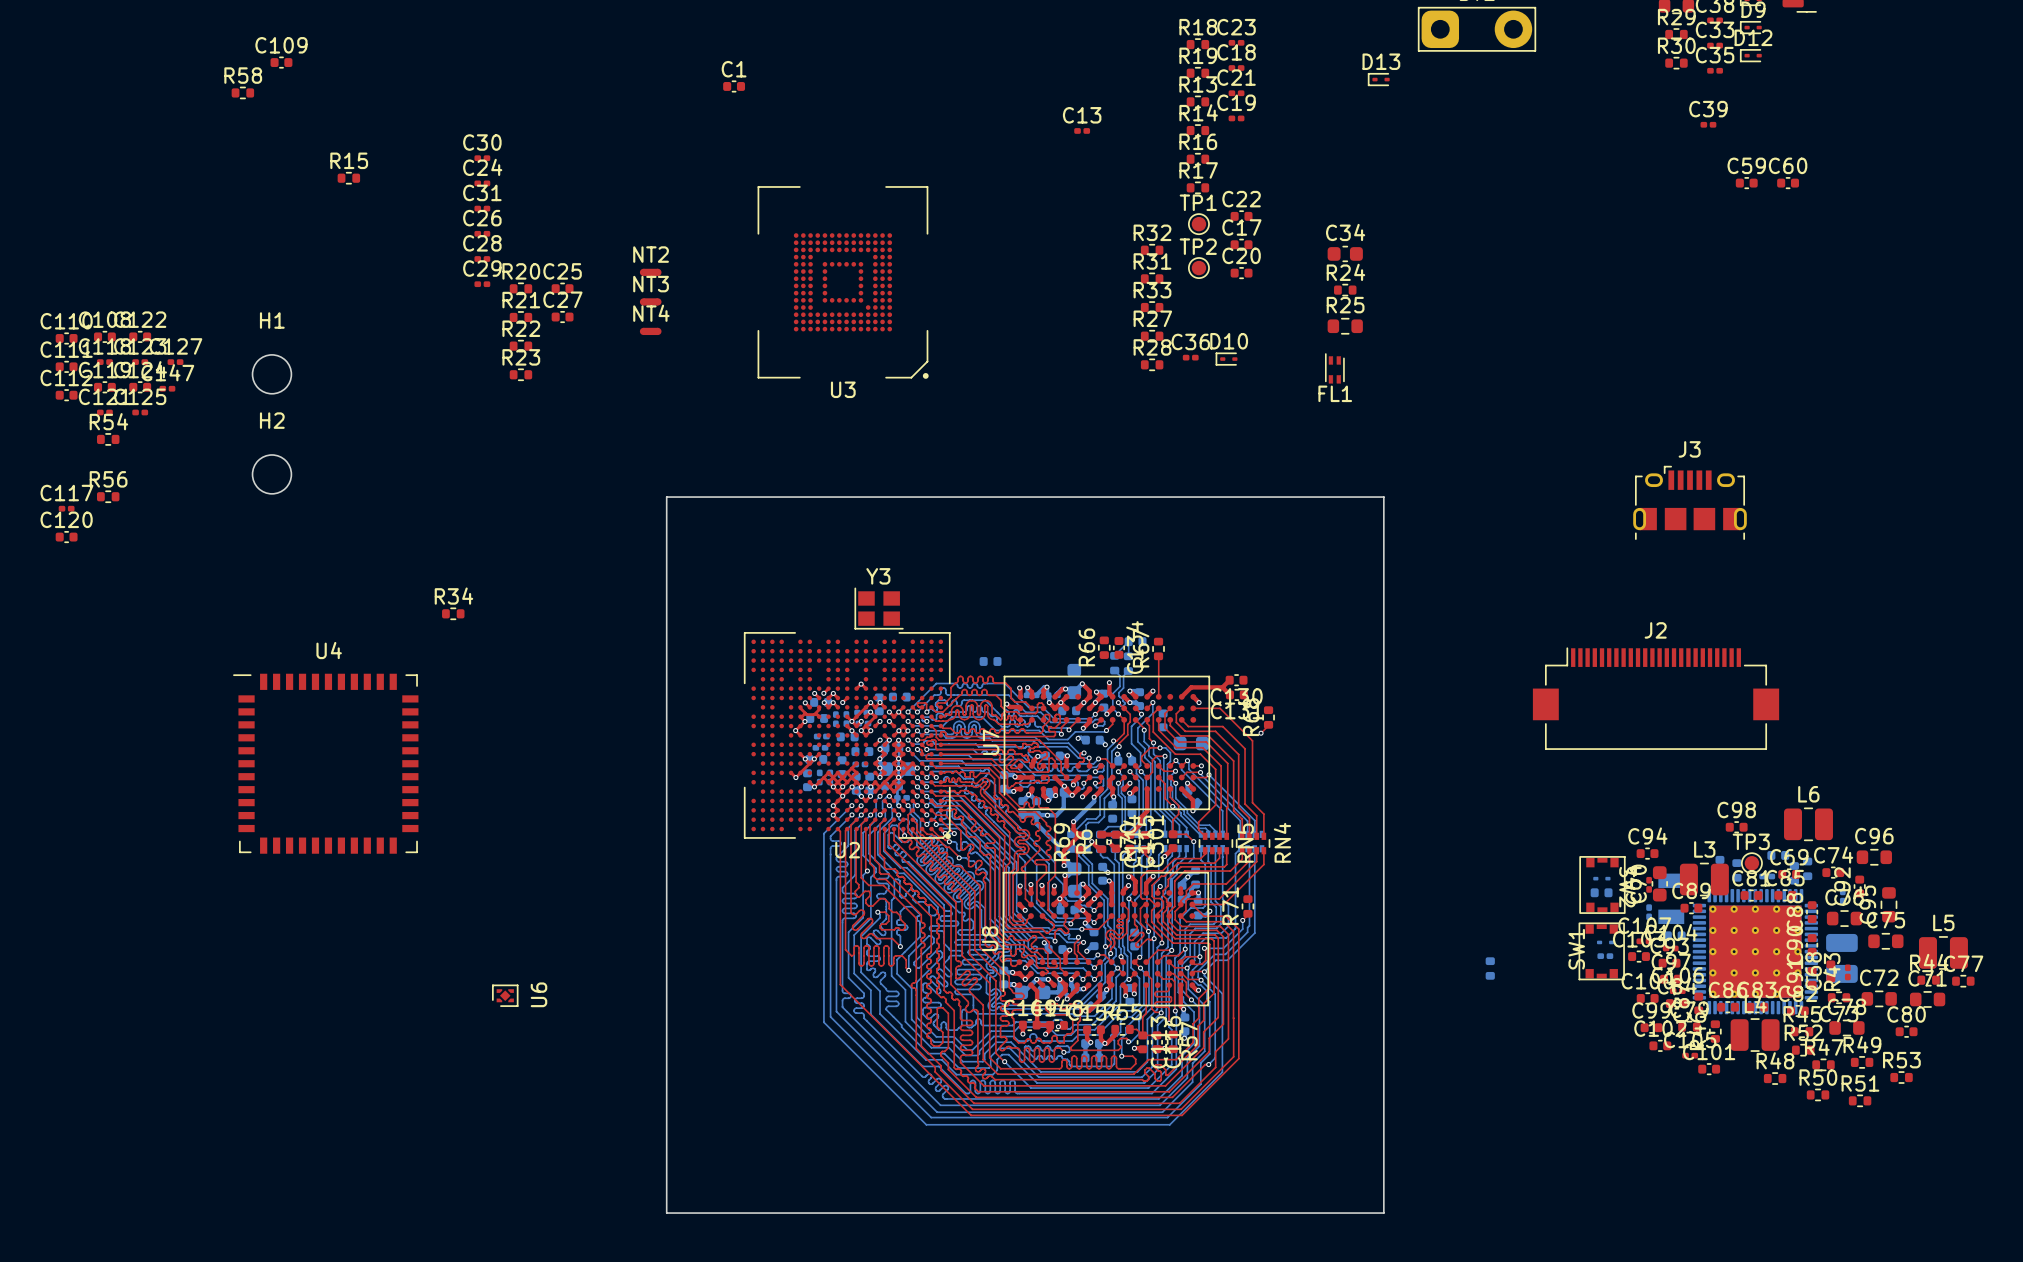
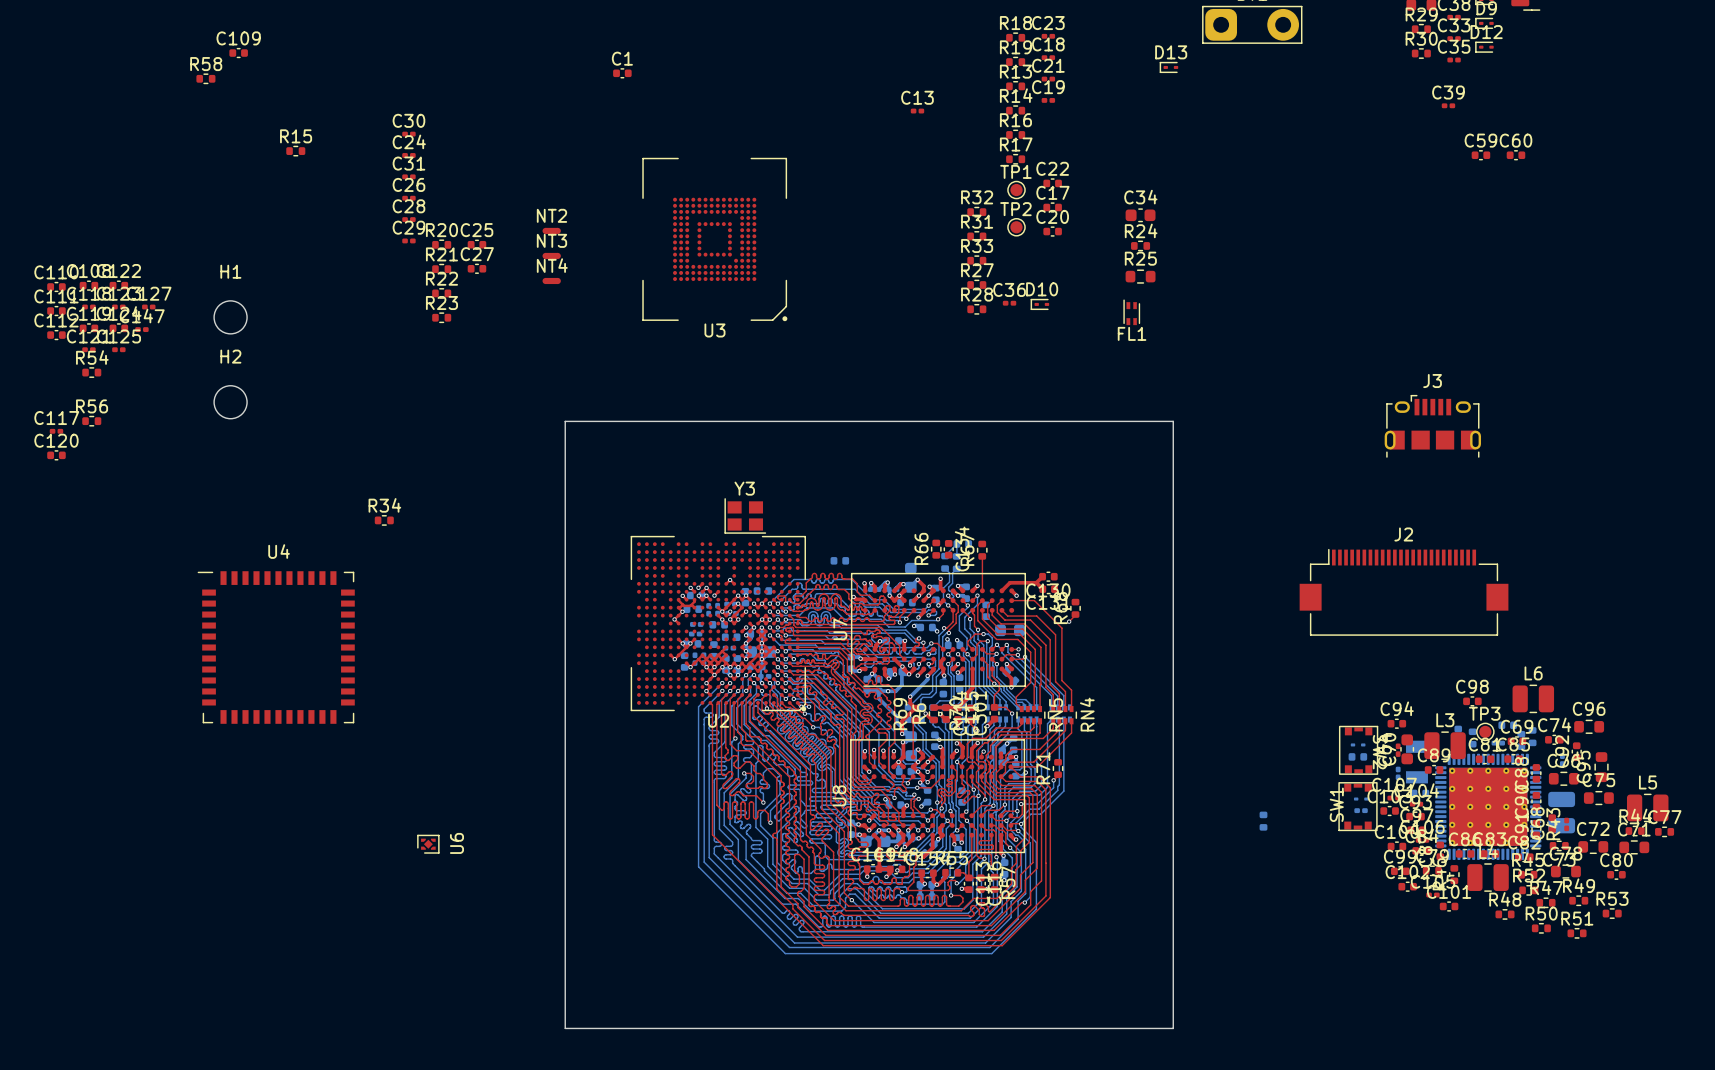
bottom track: (1169, 963) (1169, 1023) -> (1007, 731) (1007, 734) (996, 745) (997, 809) (991, 814) (991, 867)

